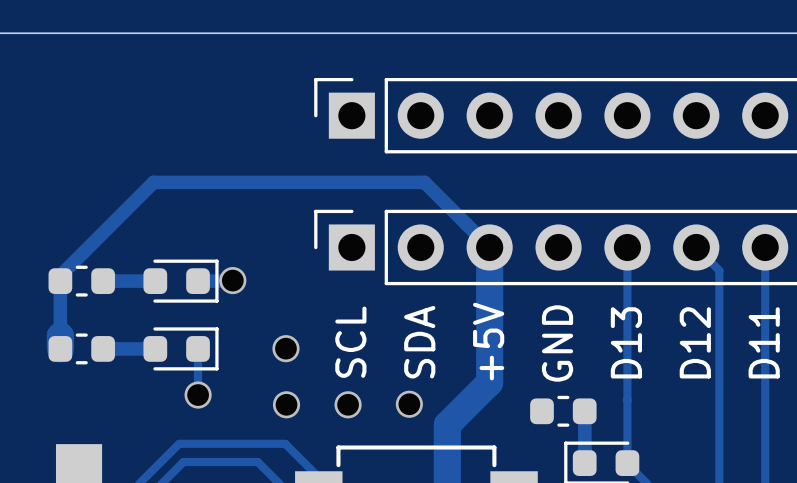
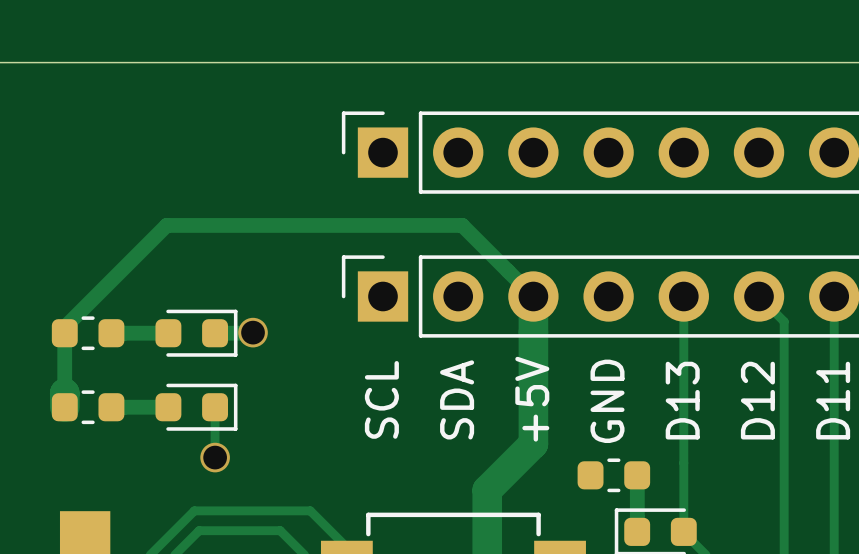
via: (285, 348) -> none
via: (286, 404) -> none
via: (348, 404) -> none
via: (409, 404) -> none

